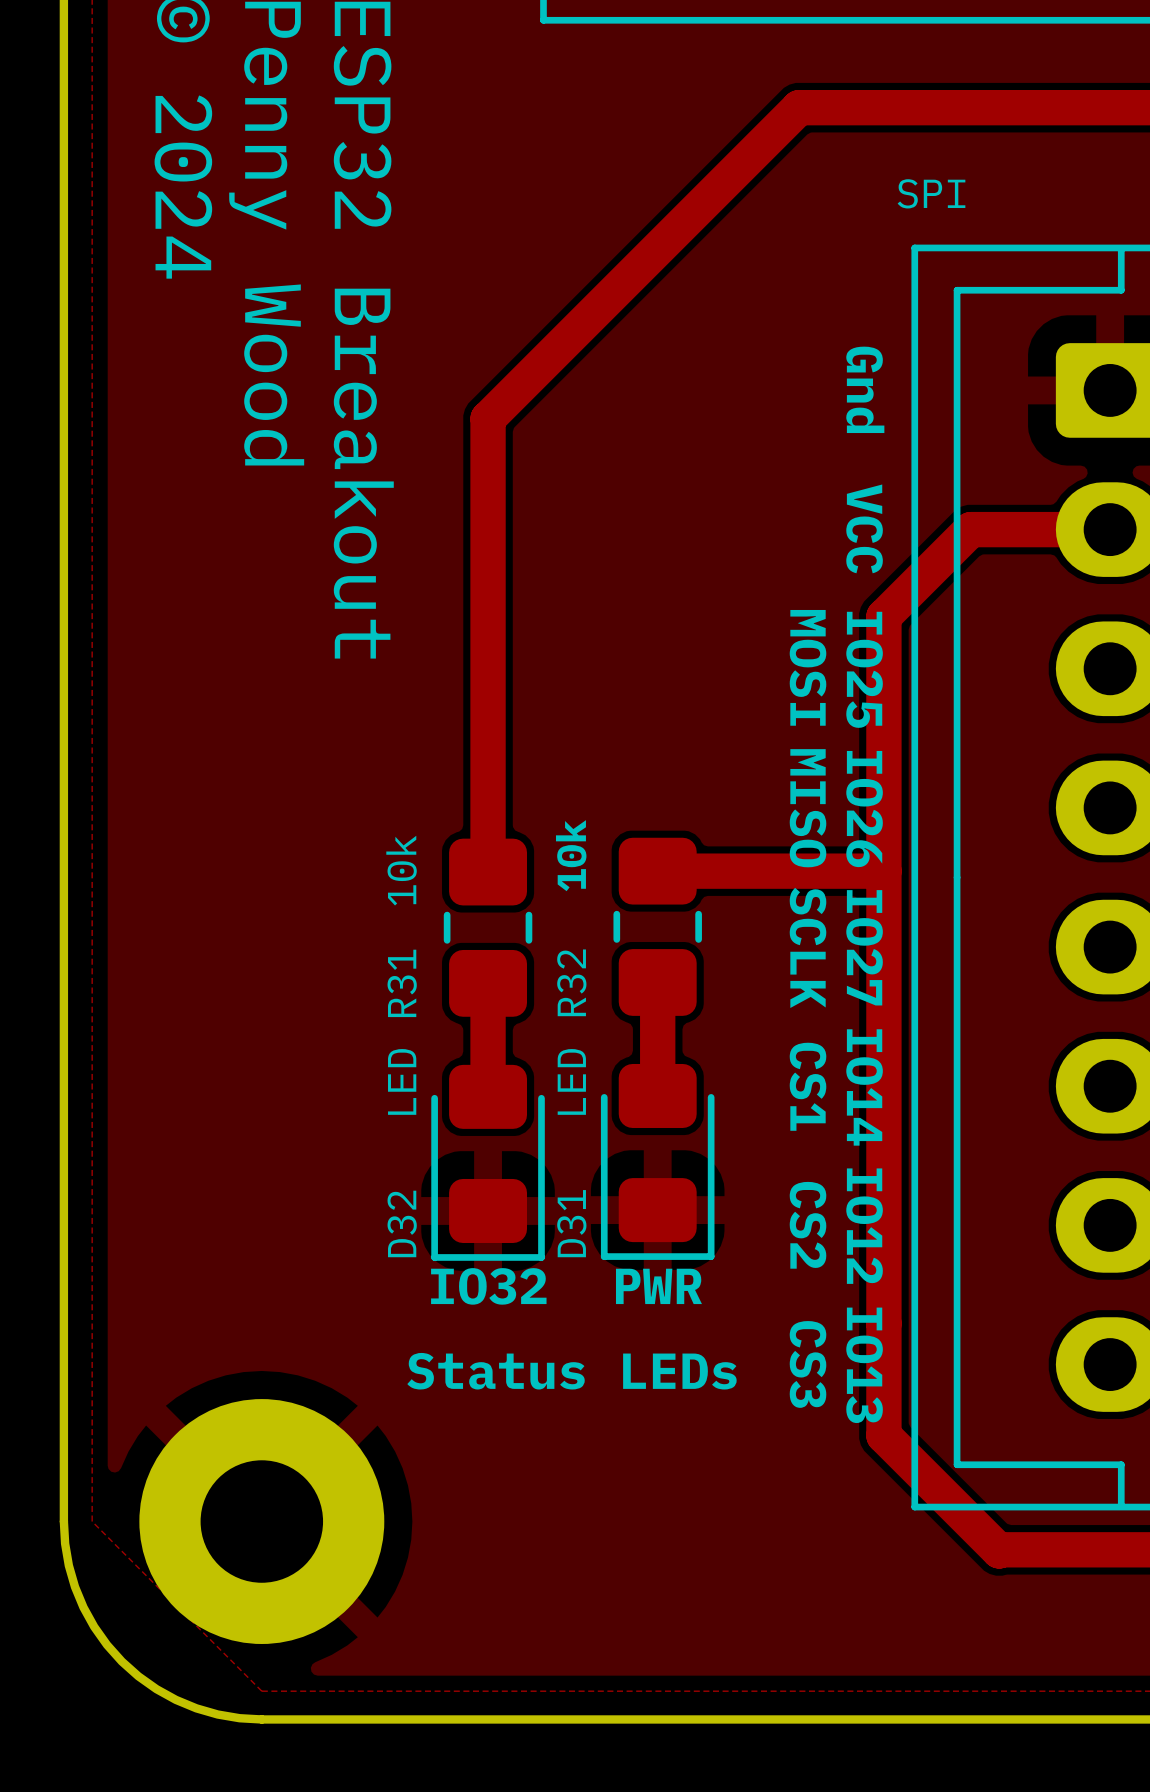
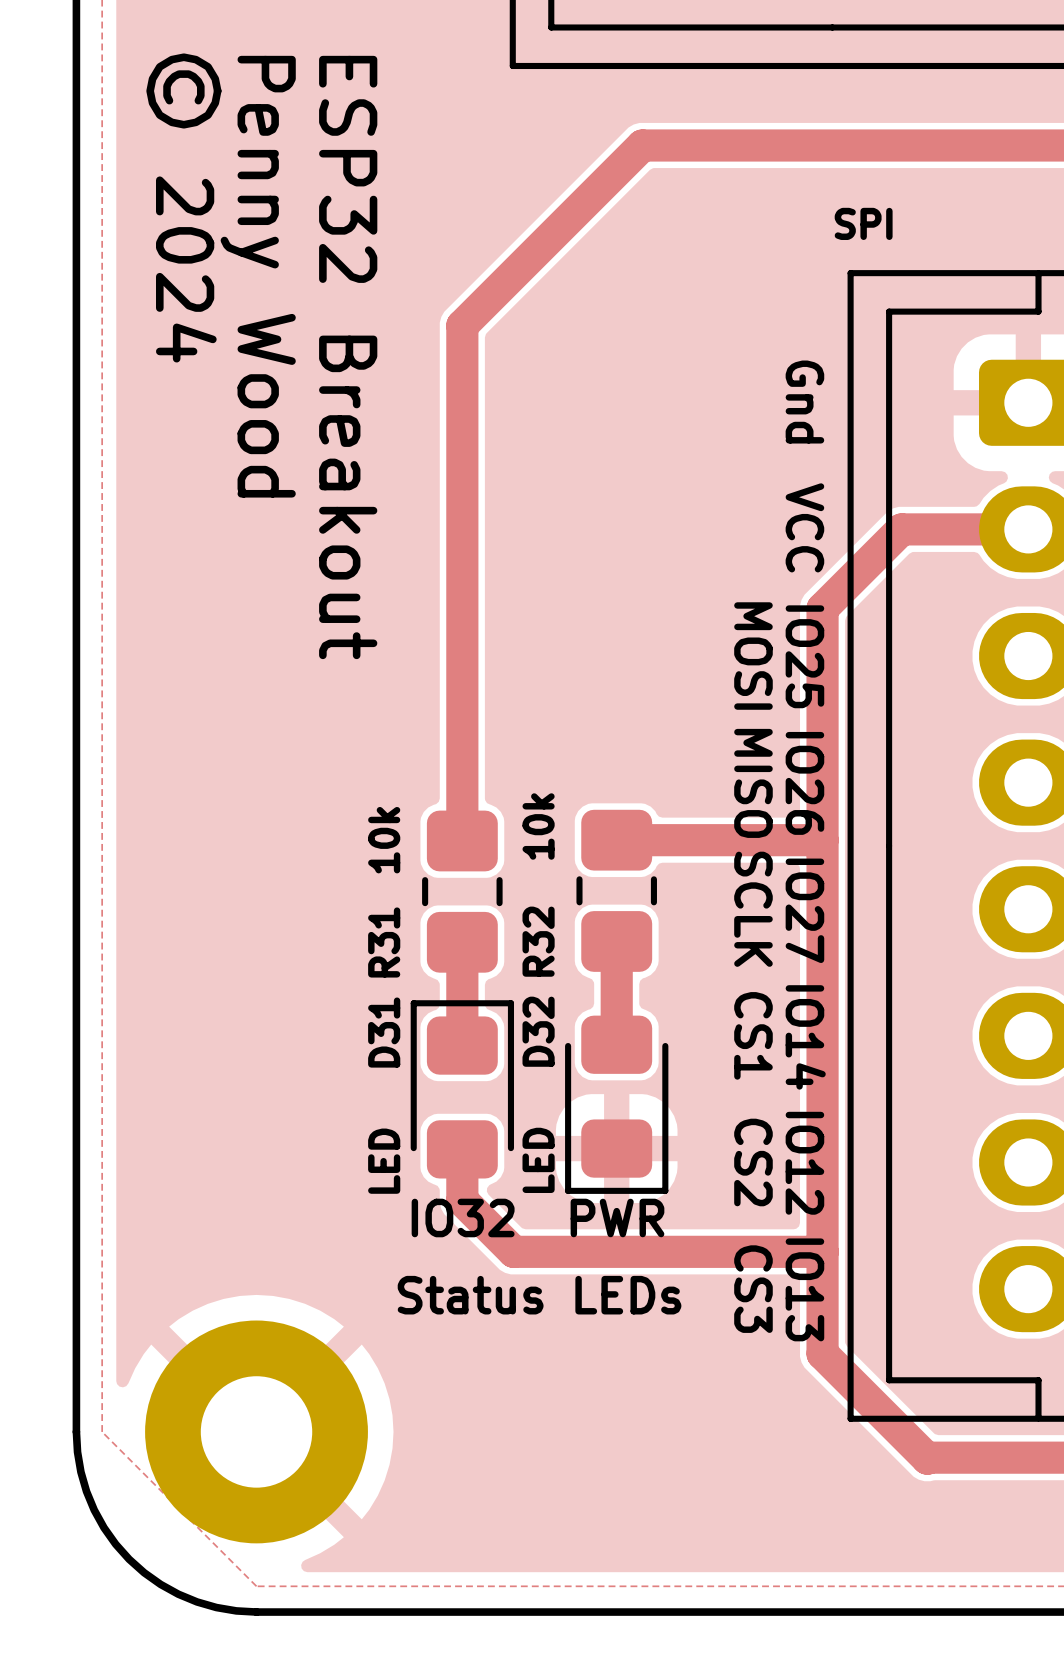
track: (799, 107) (488, 418) -> (745, 145) (642, 145) (462, 325) (462, 428)
D32 value position: LED (402, 1081) -> LED (538, 1160)
D31 rotation: 0° (488, 1162) -> 180° (462, 1089)
track: none -> (462, 1149) (462, 1200) (513, 1251) (822, 1251)
D32 name position: D32 (402, 1223) -> D32 (538, 1031)

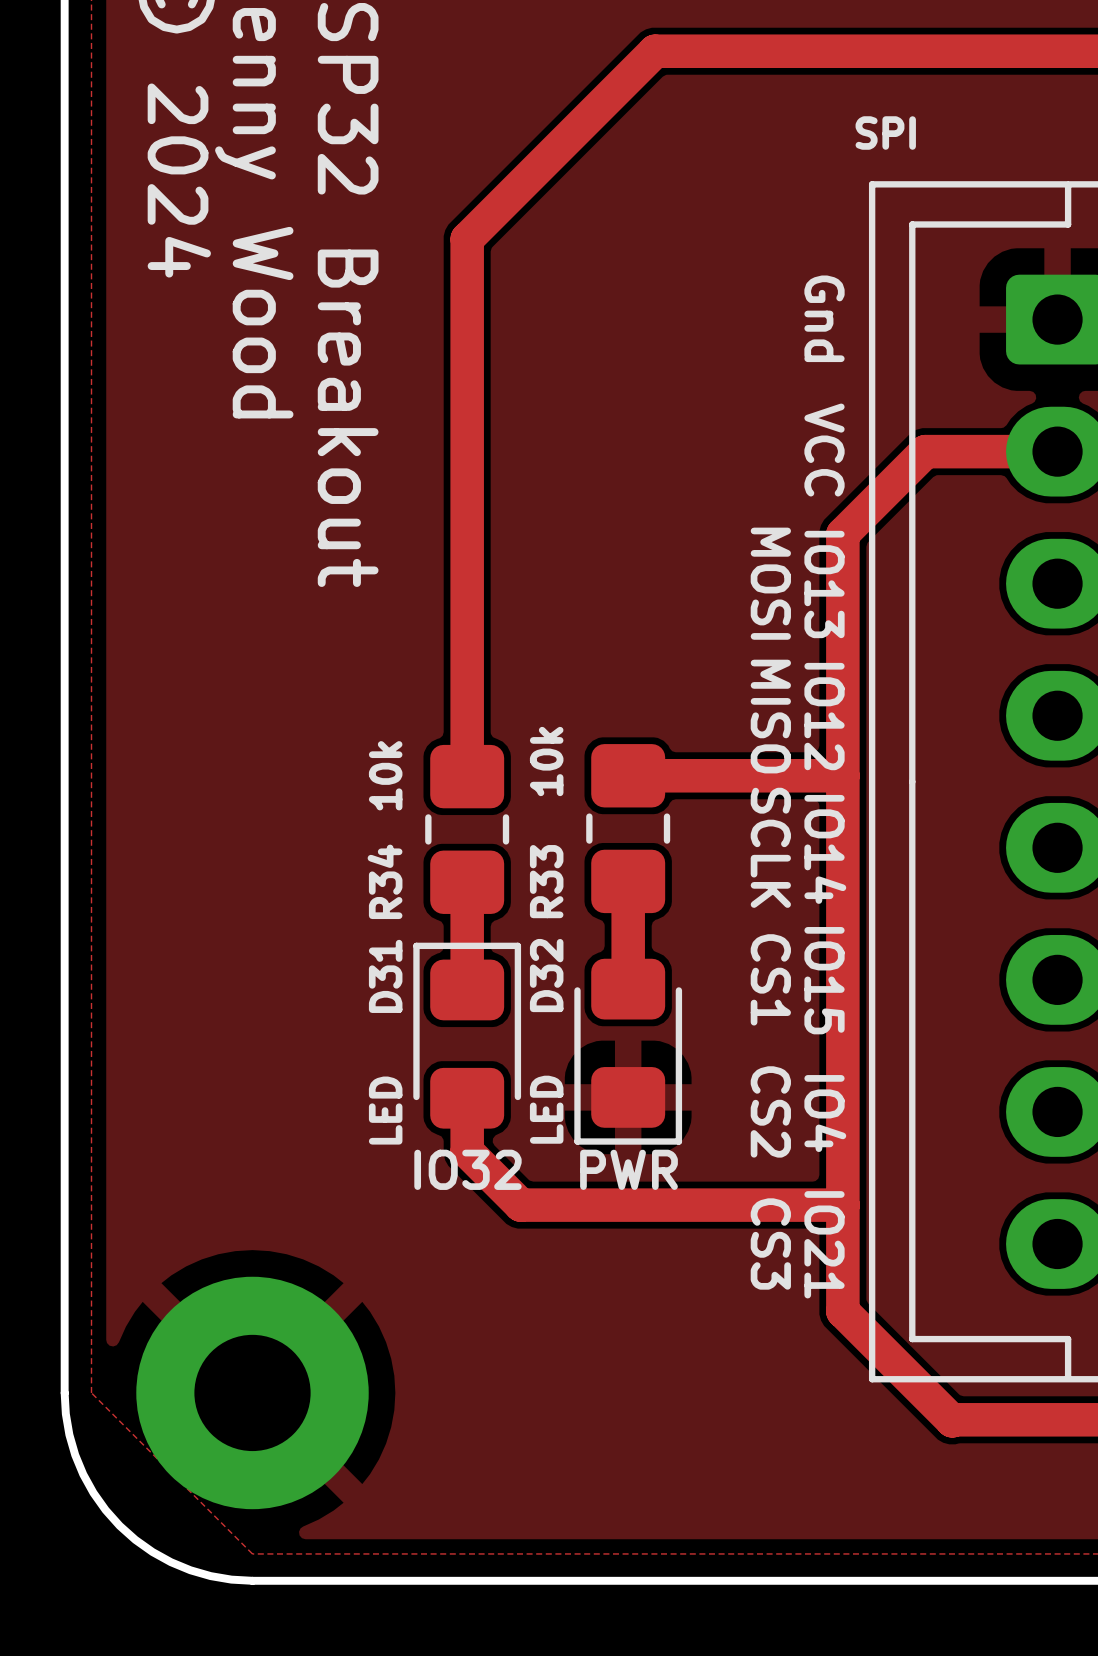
text: IO25 (804, 656) -> IO13 (824, 584)
text: IO26 (804, 783) -> IO12 (824, 716)
text: IO27 (804, 910) -> IO14 (825, 849)
R32 name: R32 (538, 941) -> R33 (546, 881)
R31 name: R31 (384, 942) -> R34 (385, 881)
text: IO14 (805, 1037) -> IO15 (824, 980)
text: IO12 (804, 1163) -> IO4 (825, 1113)
text: IO13 (804, 1289) -> IO21 (824, 1244)
text: Status LEDs (539, 1295) -> none

